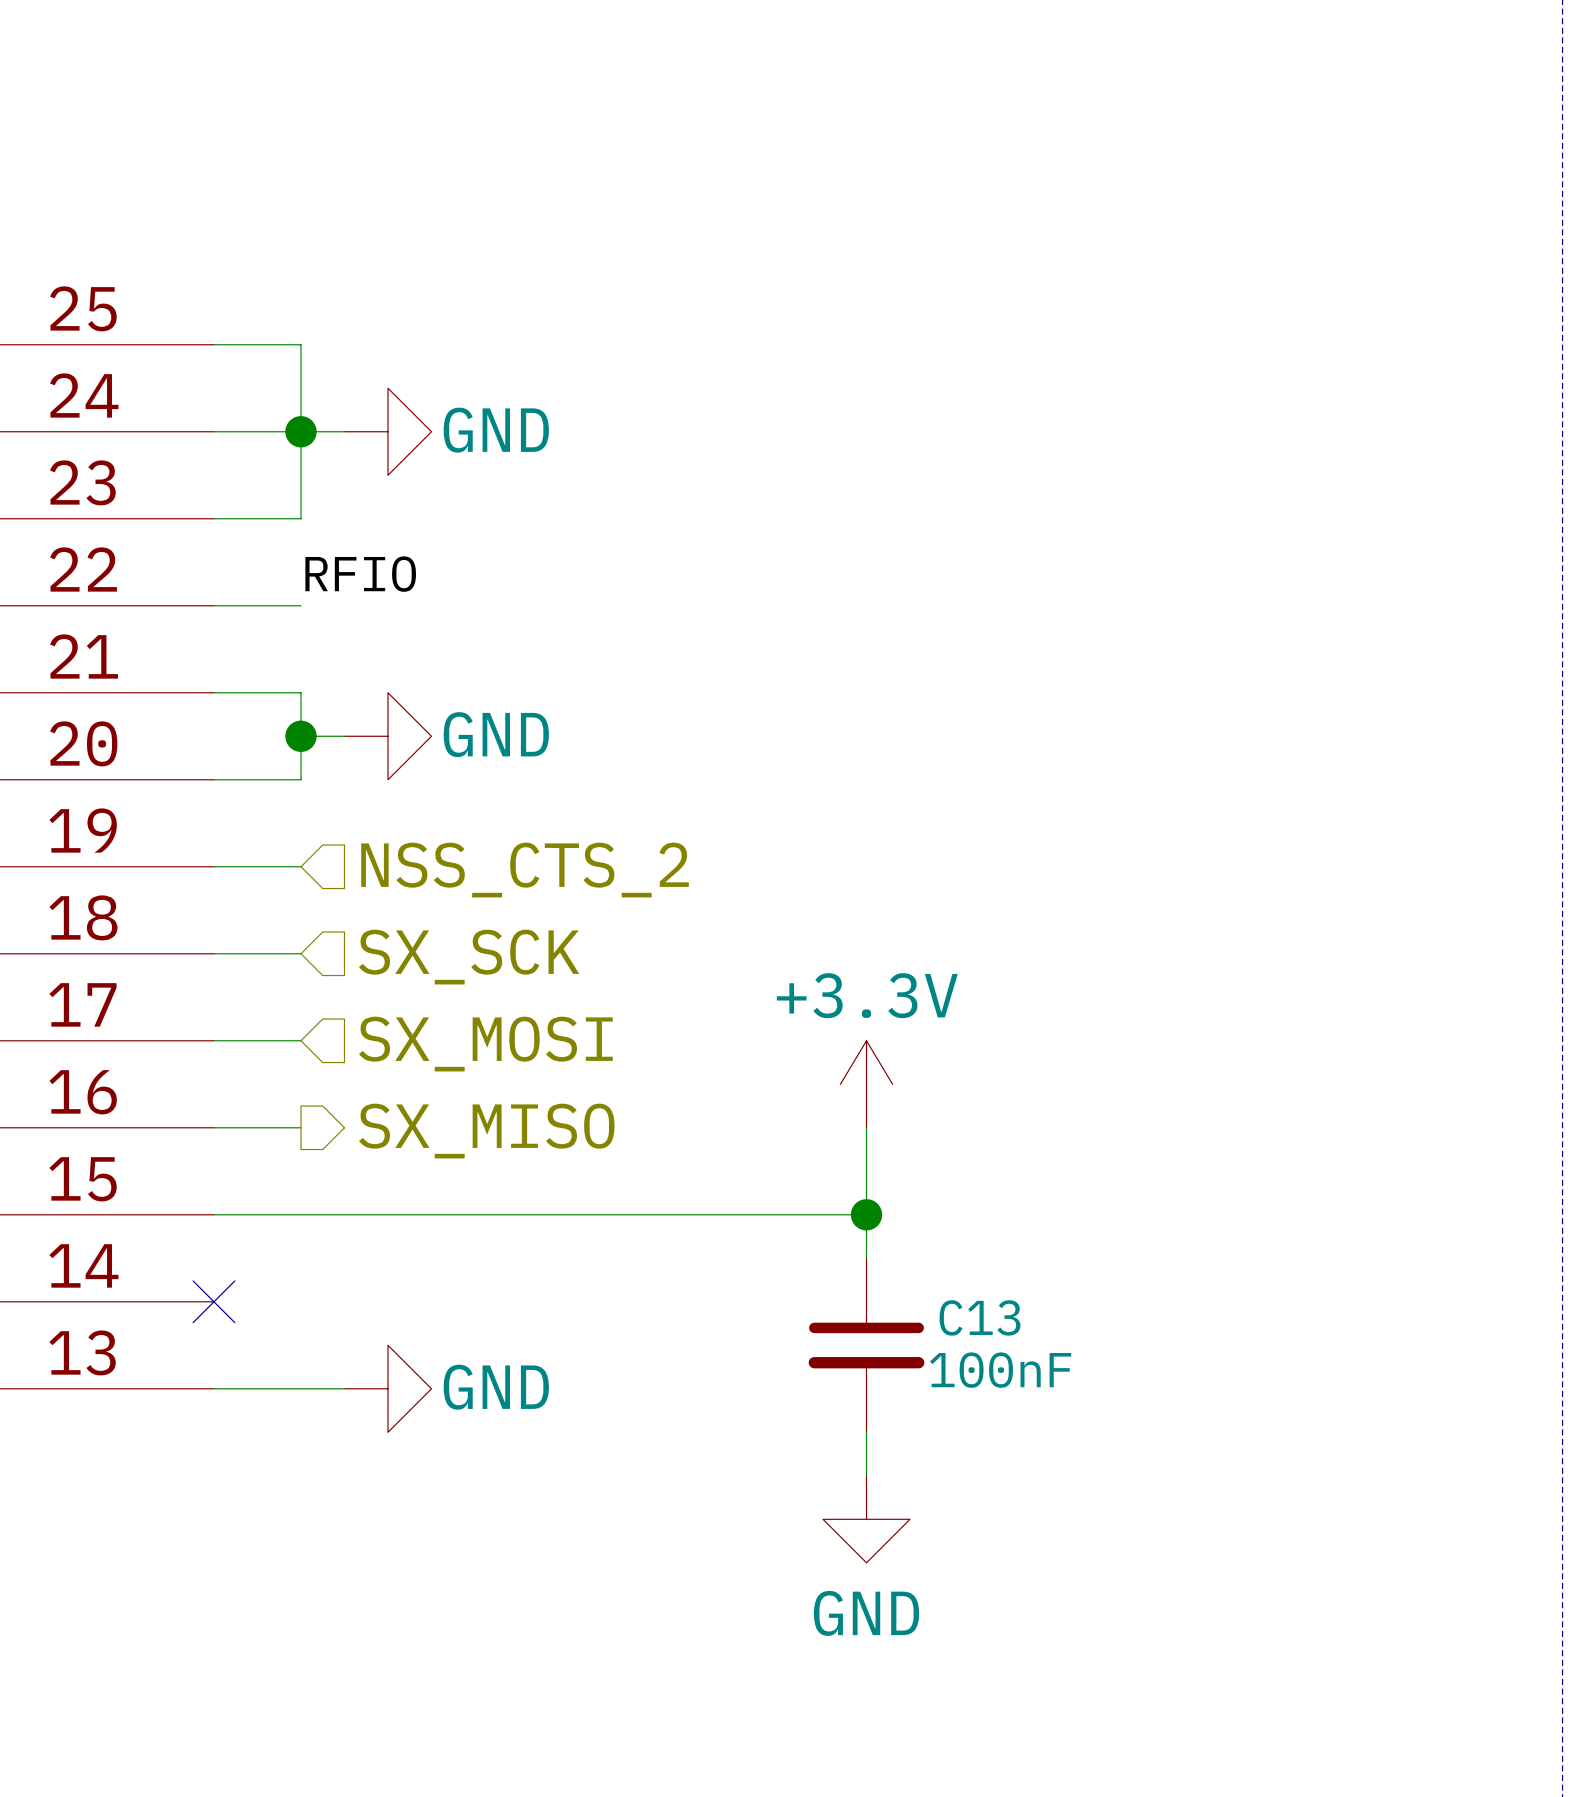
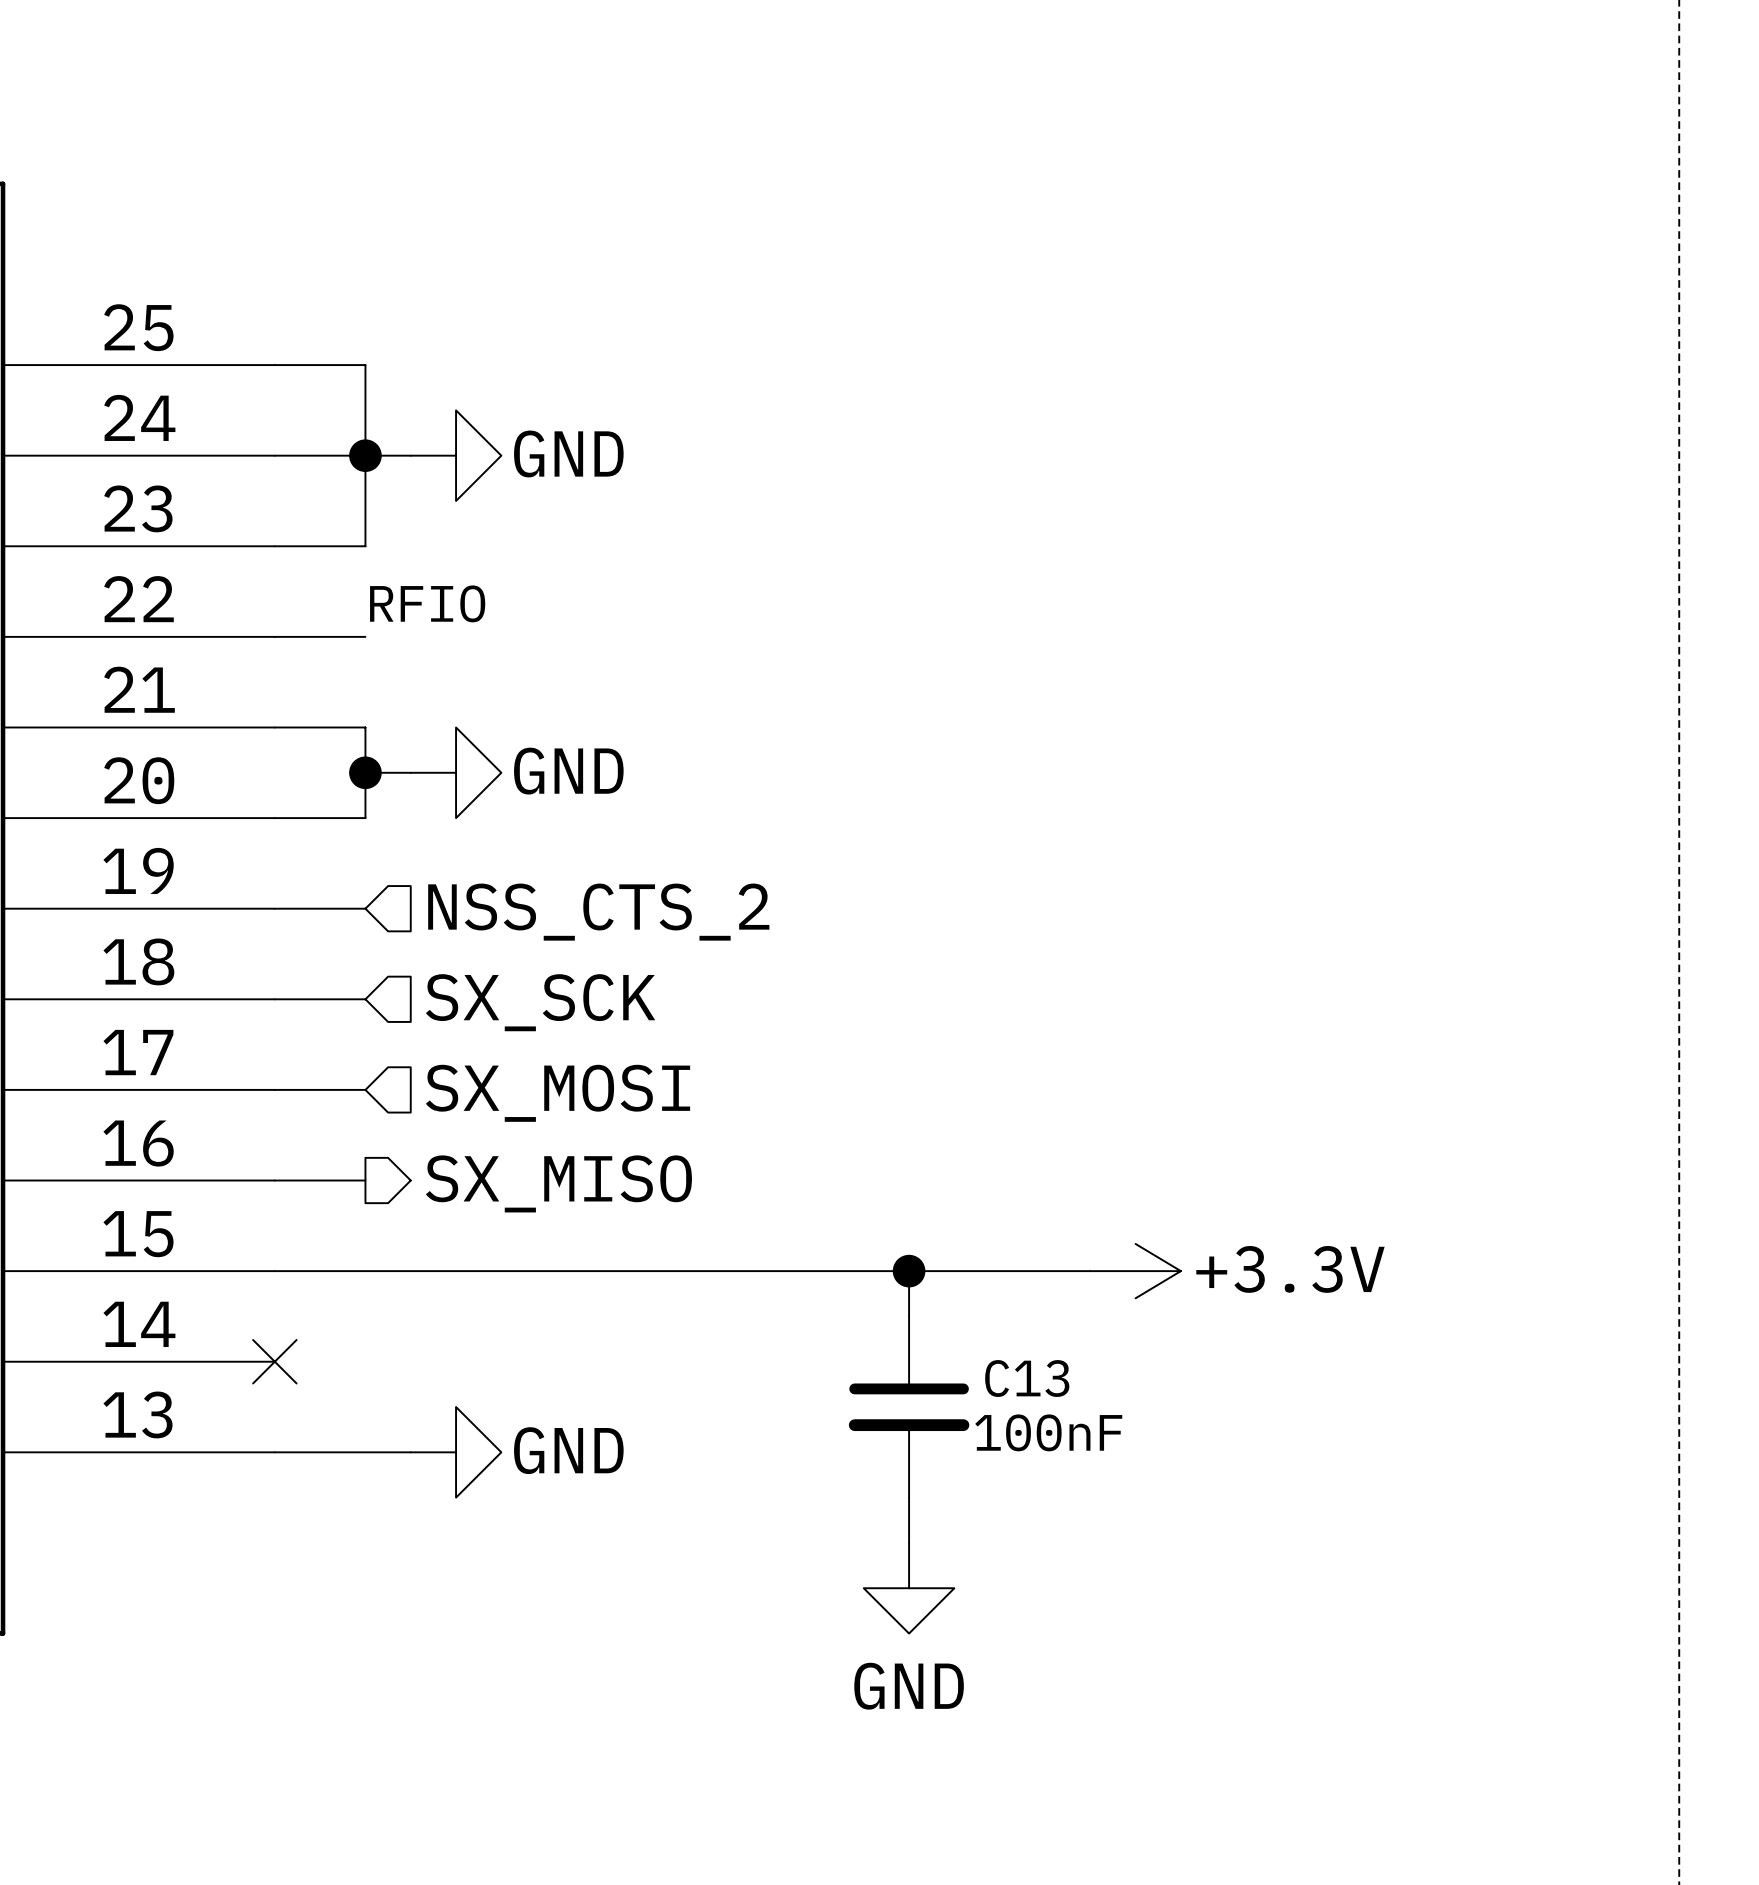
power symbol rotation: 0° (866, 1084) -> 90° clockwise (1135, 1271)
power symbol position: +3.3V (866, 1084) -> +3.3V (1135, 1271)
wire: (866, 1127) (866, 1258) -> none
wire: none -> (909, 1271) (909, 1316)
wire: none -> (954, 1271) (1090, 1271)
junction position: (866, 1214) -> (909, 1271)
C13 position: (866, 1345) -> (909, 1407)
wire: (866, 1432) (866, 1475) -> (909, 1497) (909, 1542)
power symbol position: GND (866, 1519) -> GND (909, 1588)

